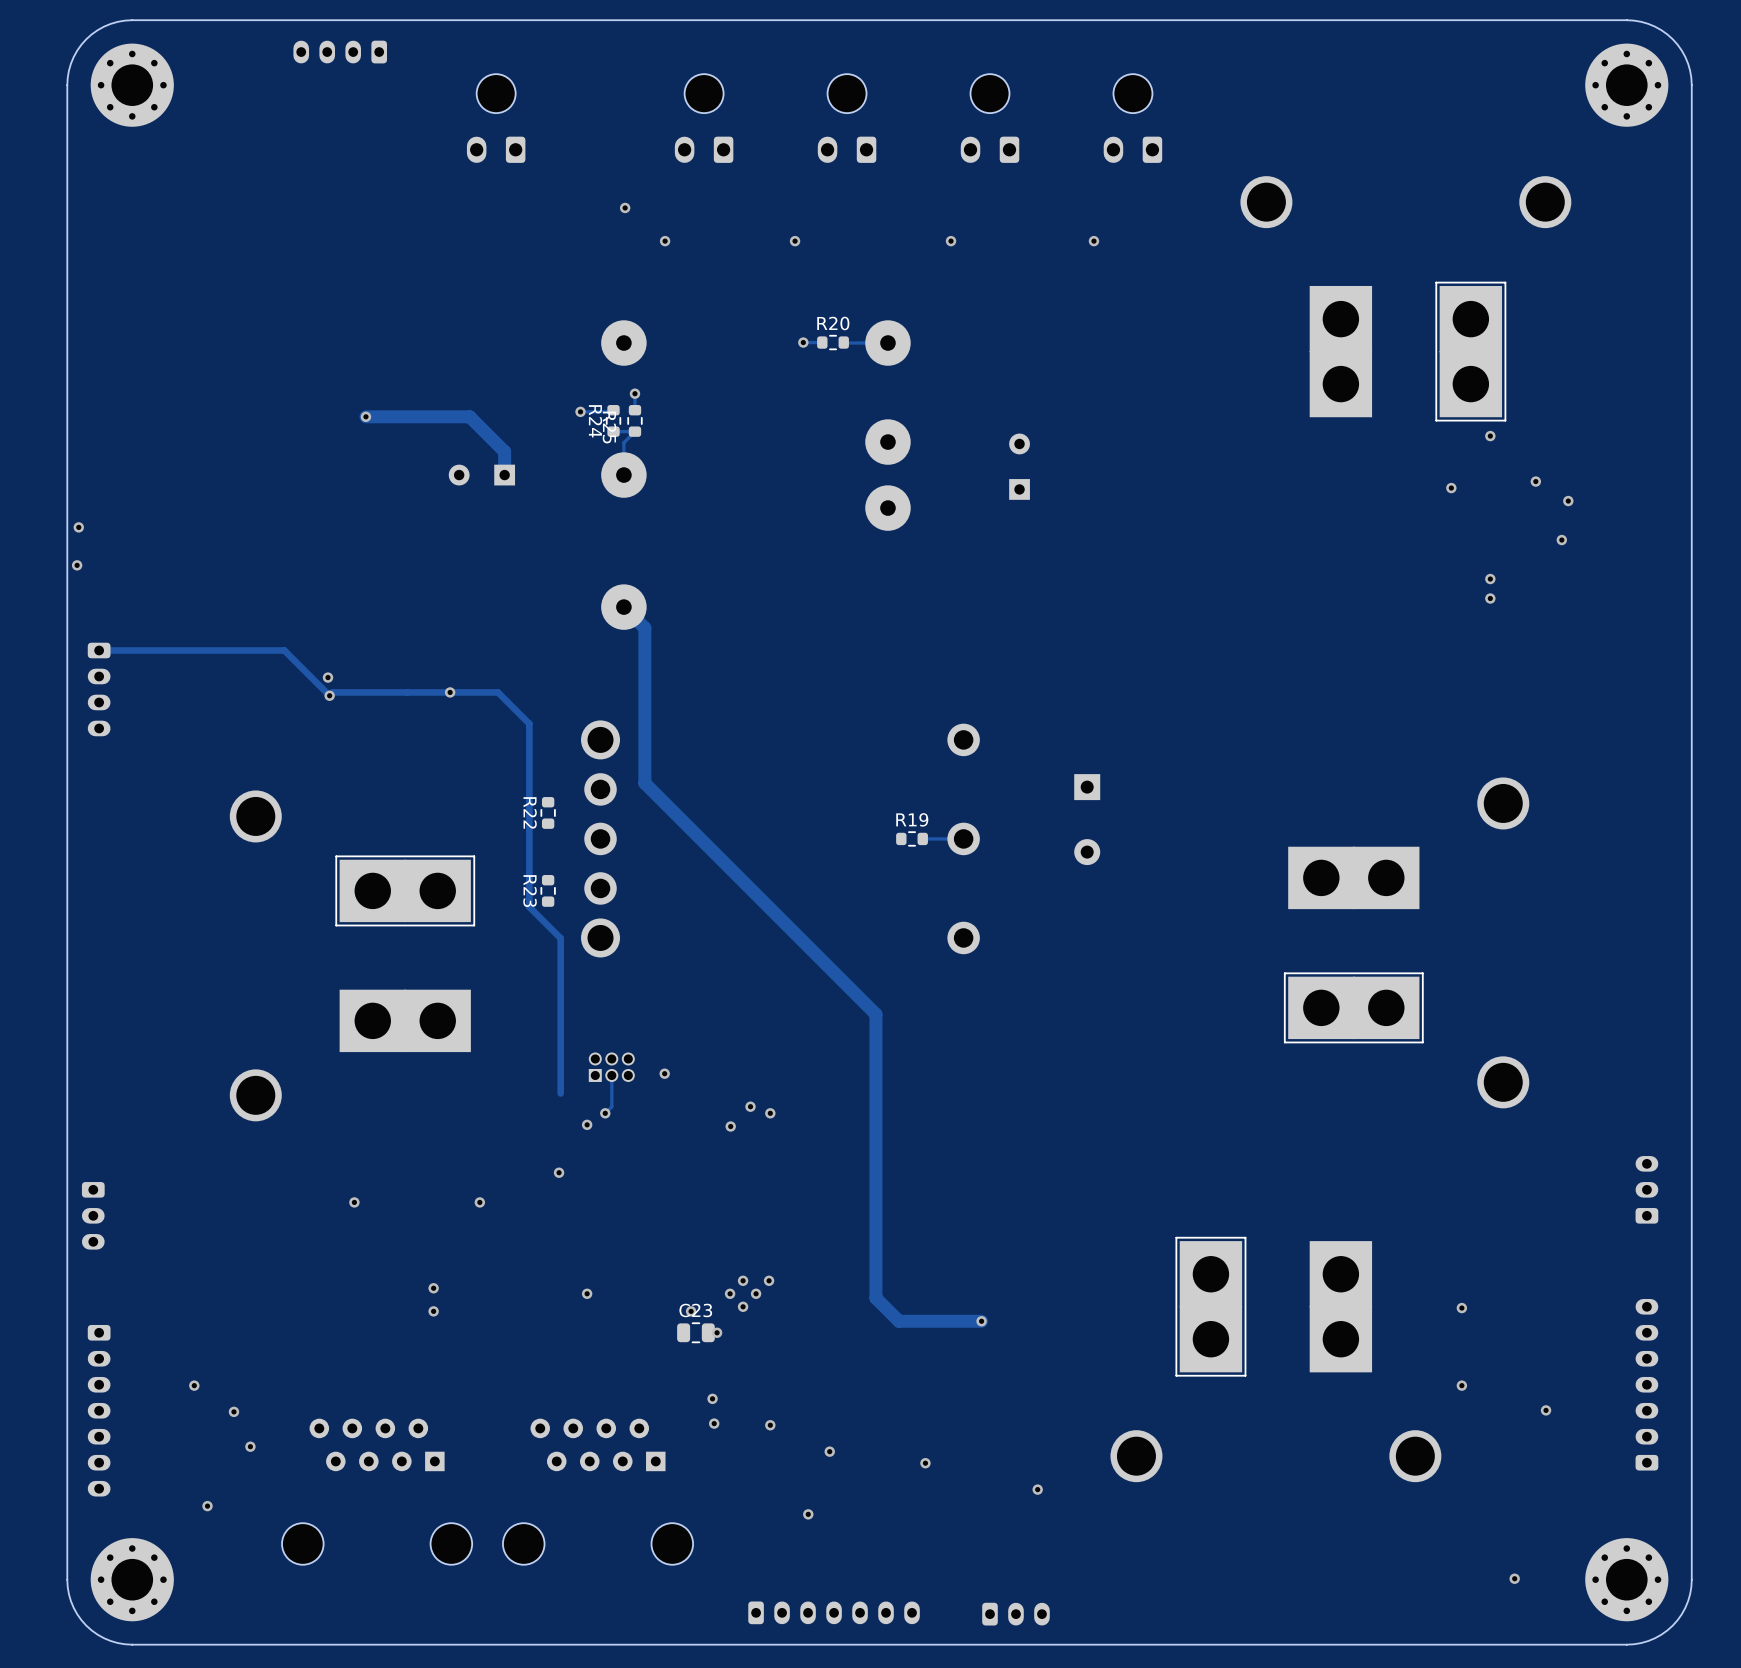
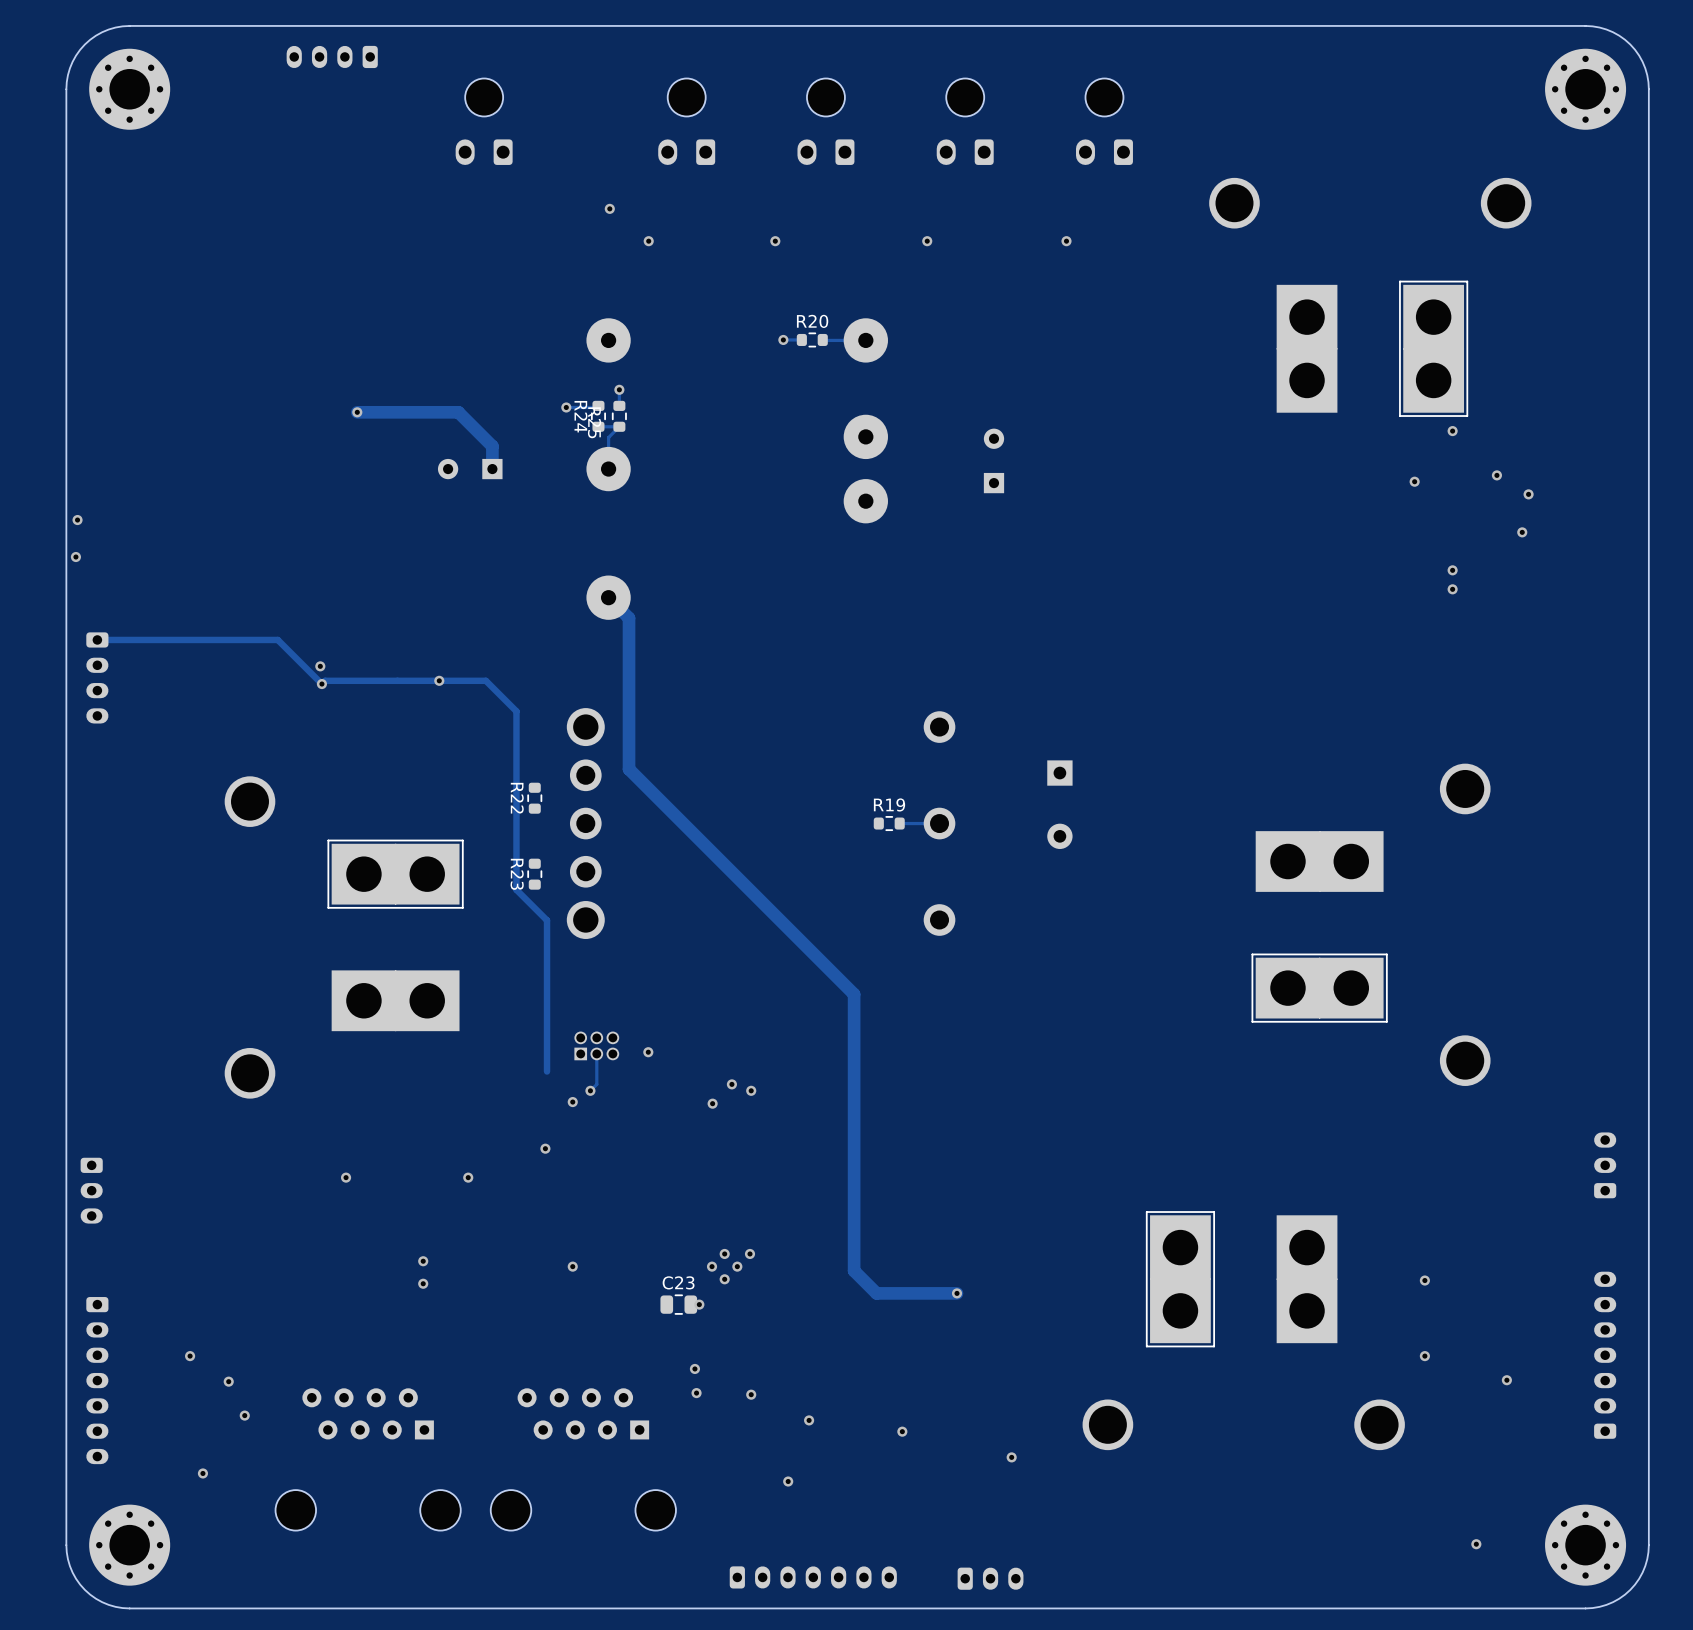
via: (691, 1311) -> none

